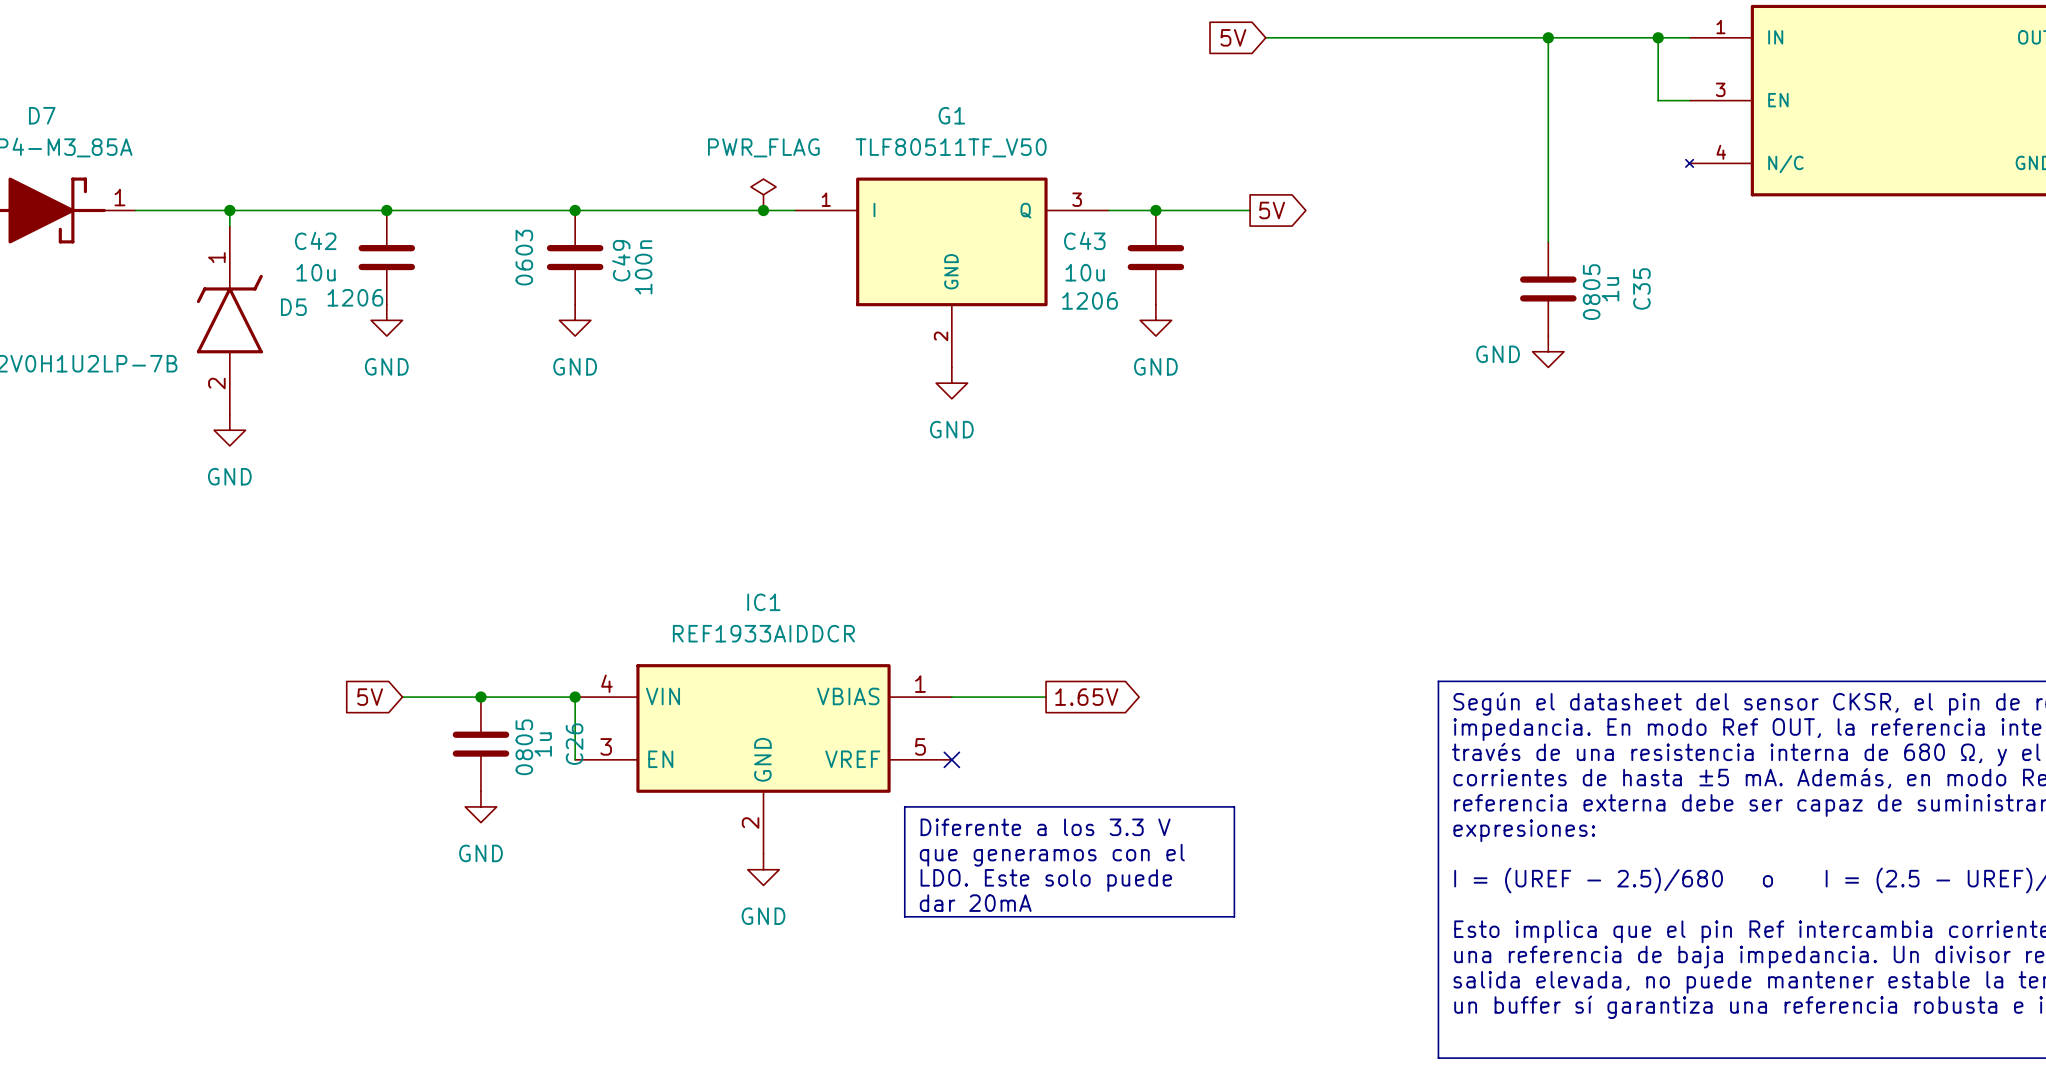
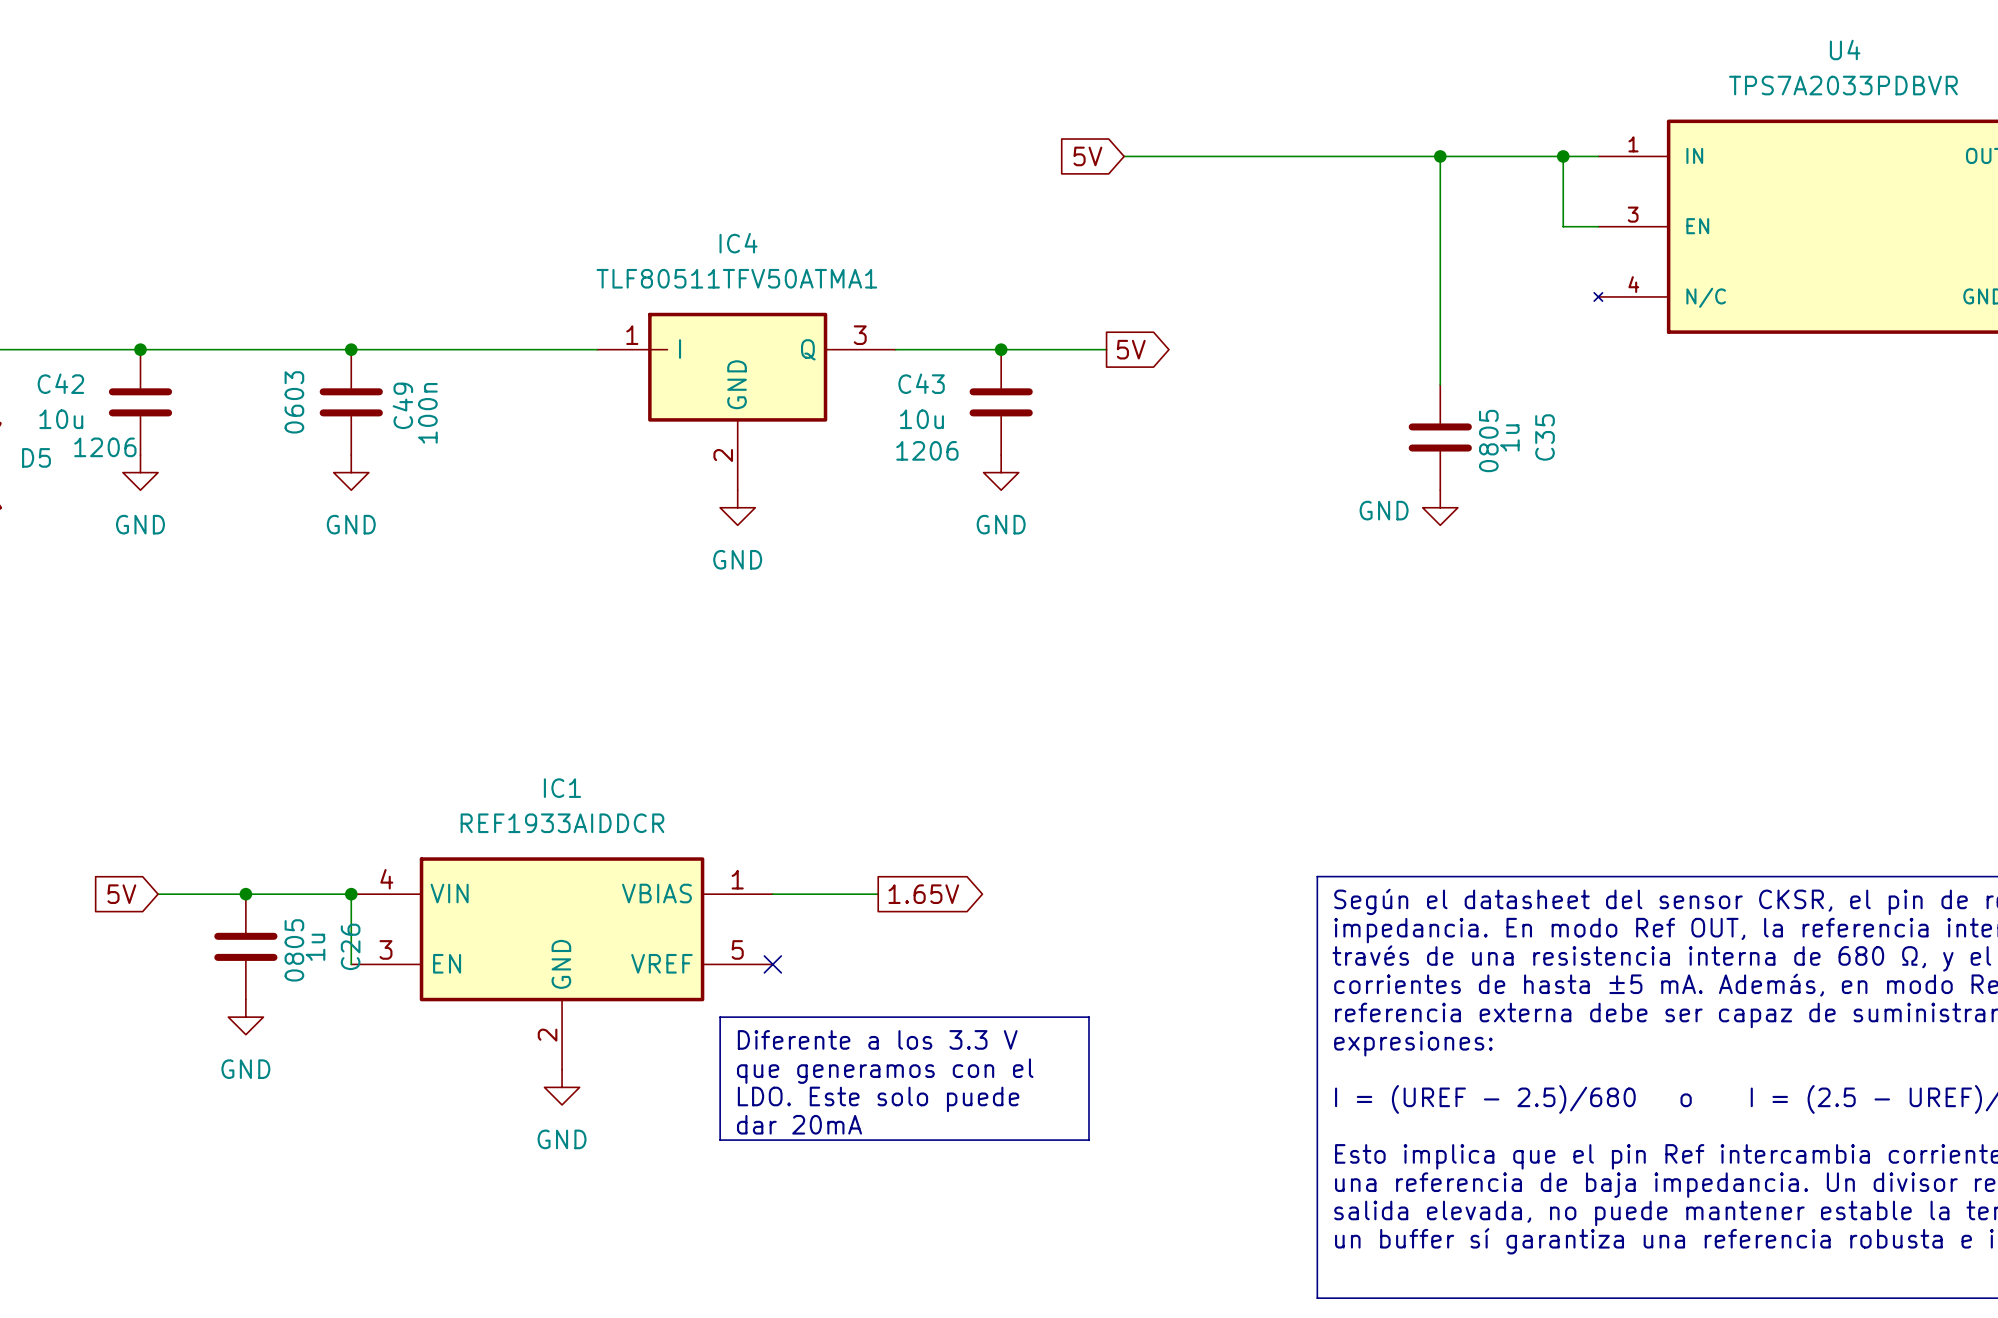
power symbol: PWR_FLAG (763, 194) -> none
junction: (763, 210) -> none
IC4: none -> TLF80511TFV50ATMA1 (746, 401)
G1: TLF80511TF_V50 (951, 272) -> none
power symbol position: GND (951, 383) -> GND (737, 507)

